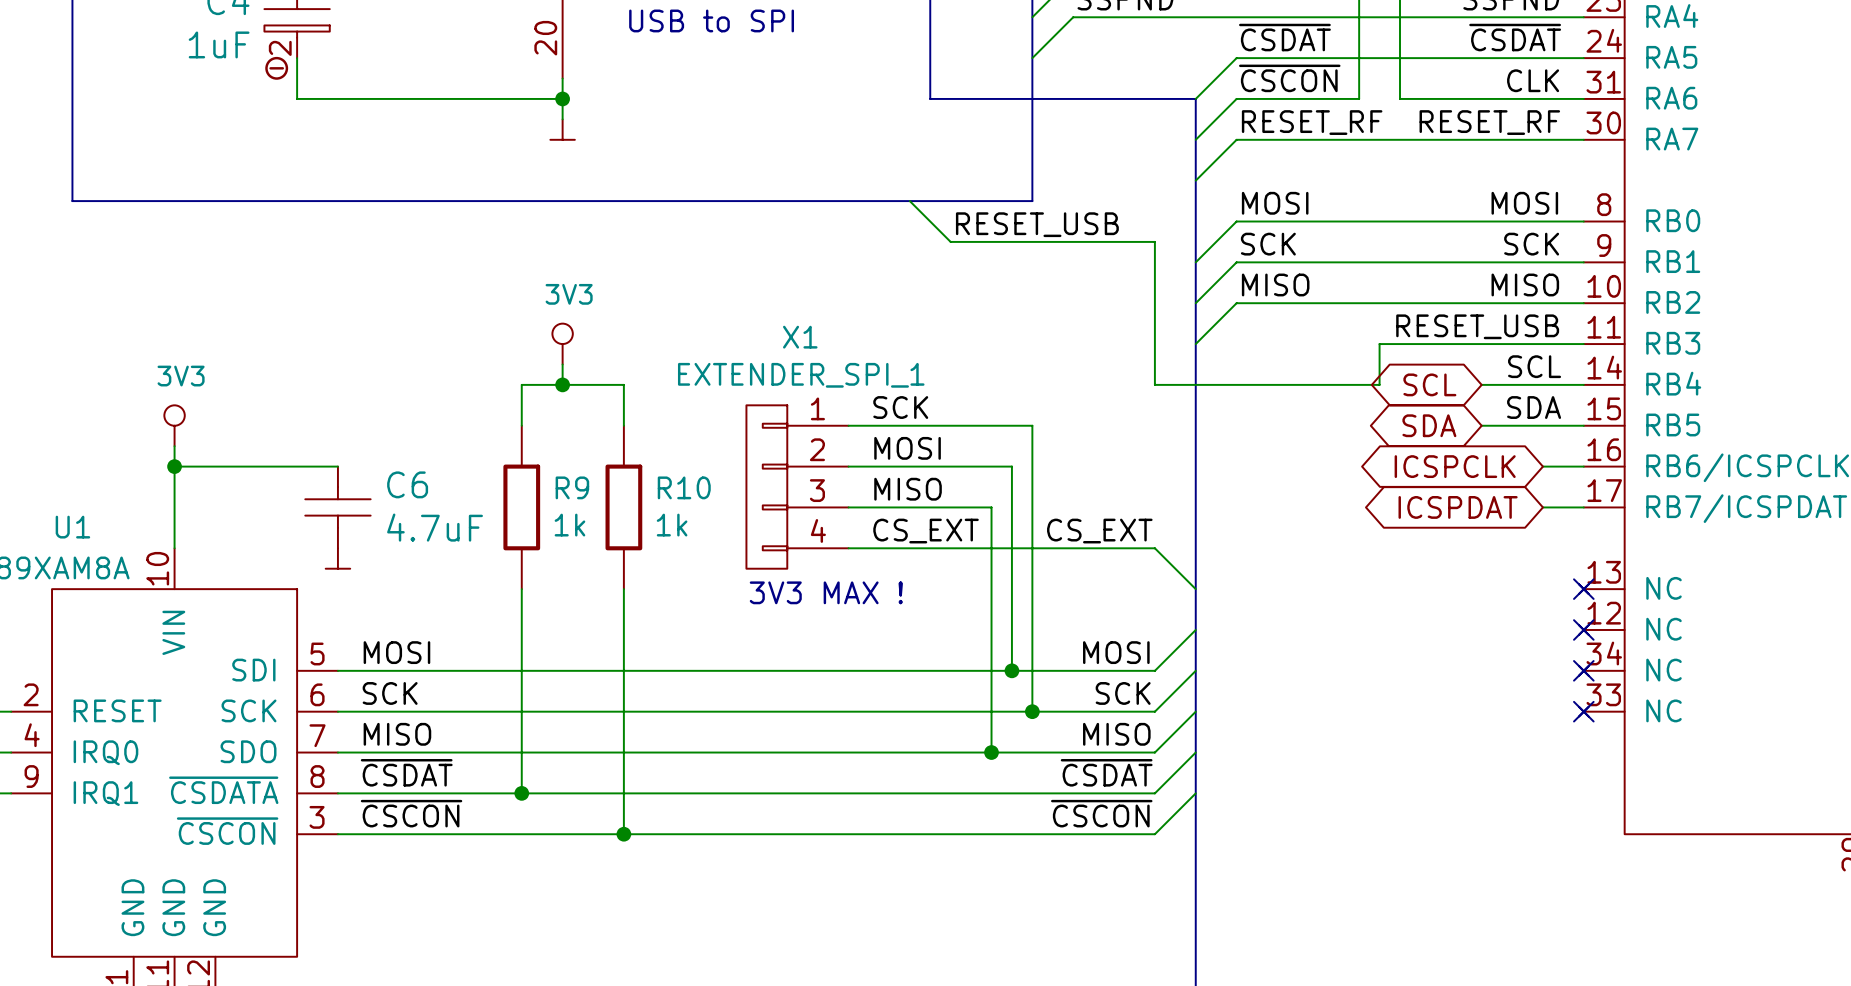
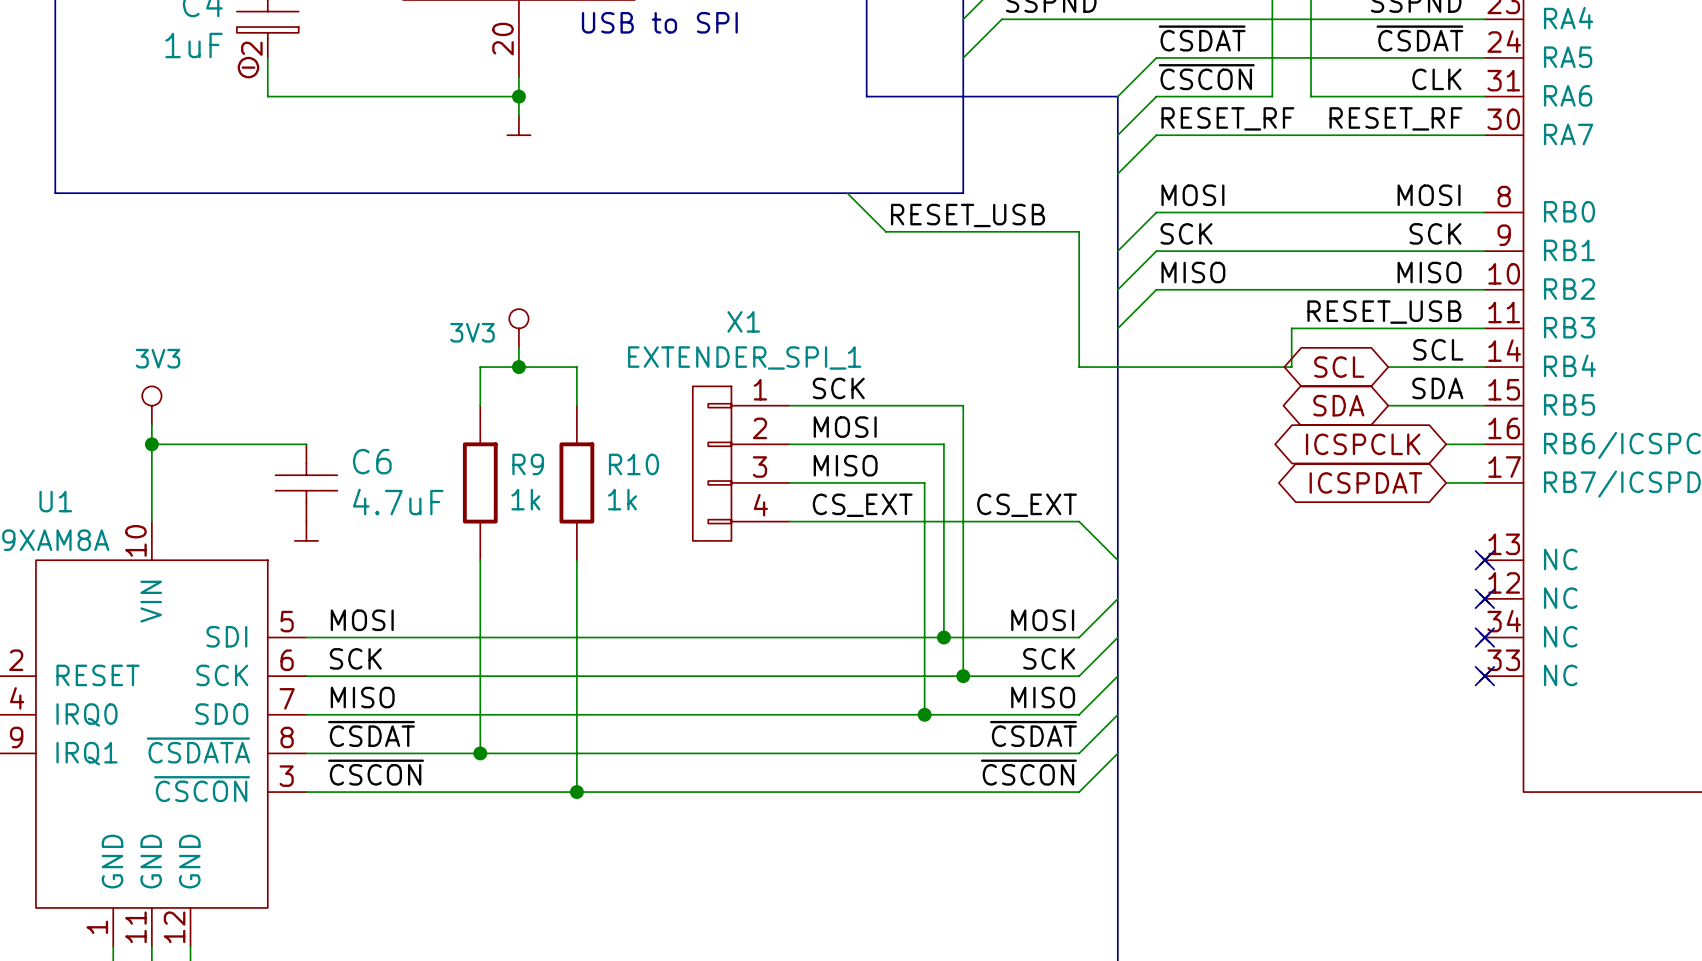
power symbol text position: 3V3 (569, 294) -> 3V3 (472, 332)
text: 3V3 MAX ! (826, 592) -> none

